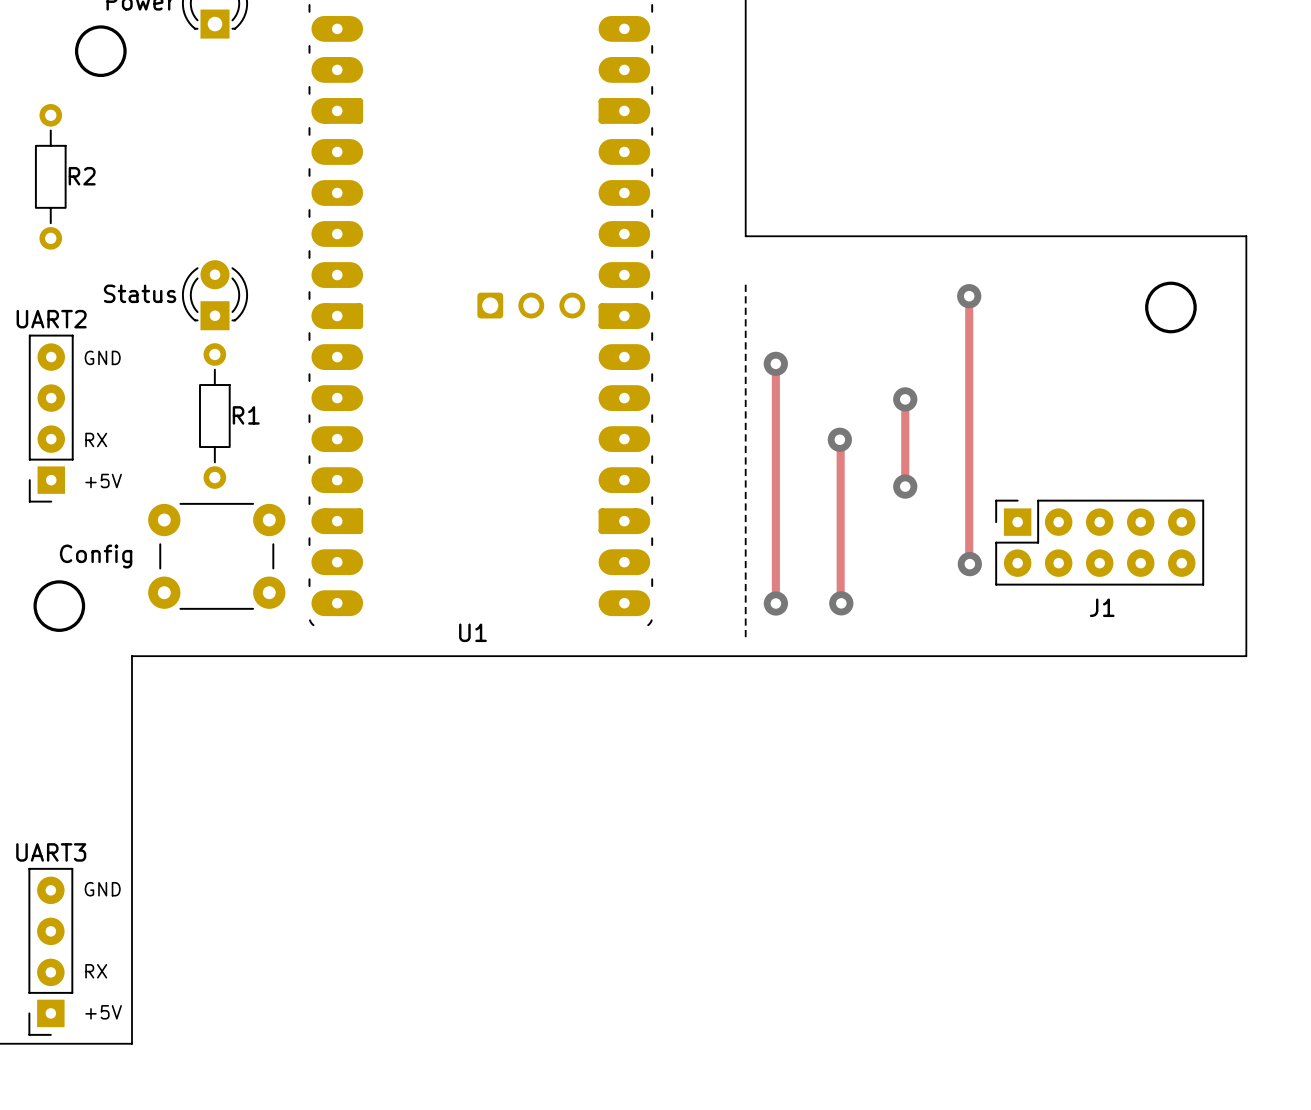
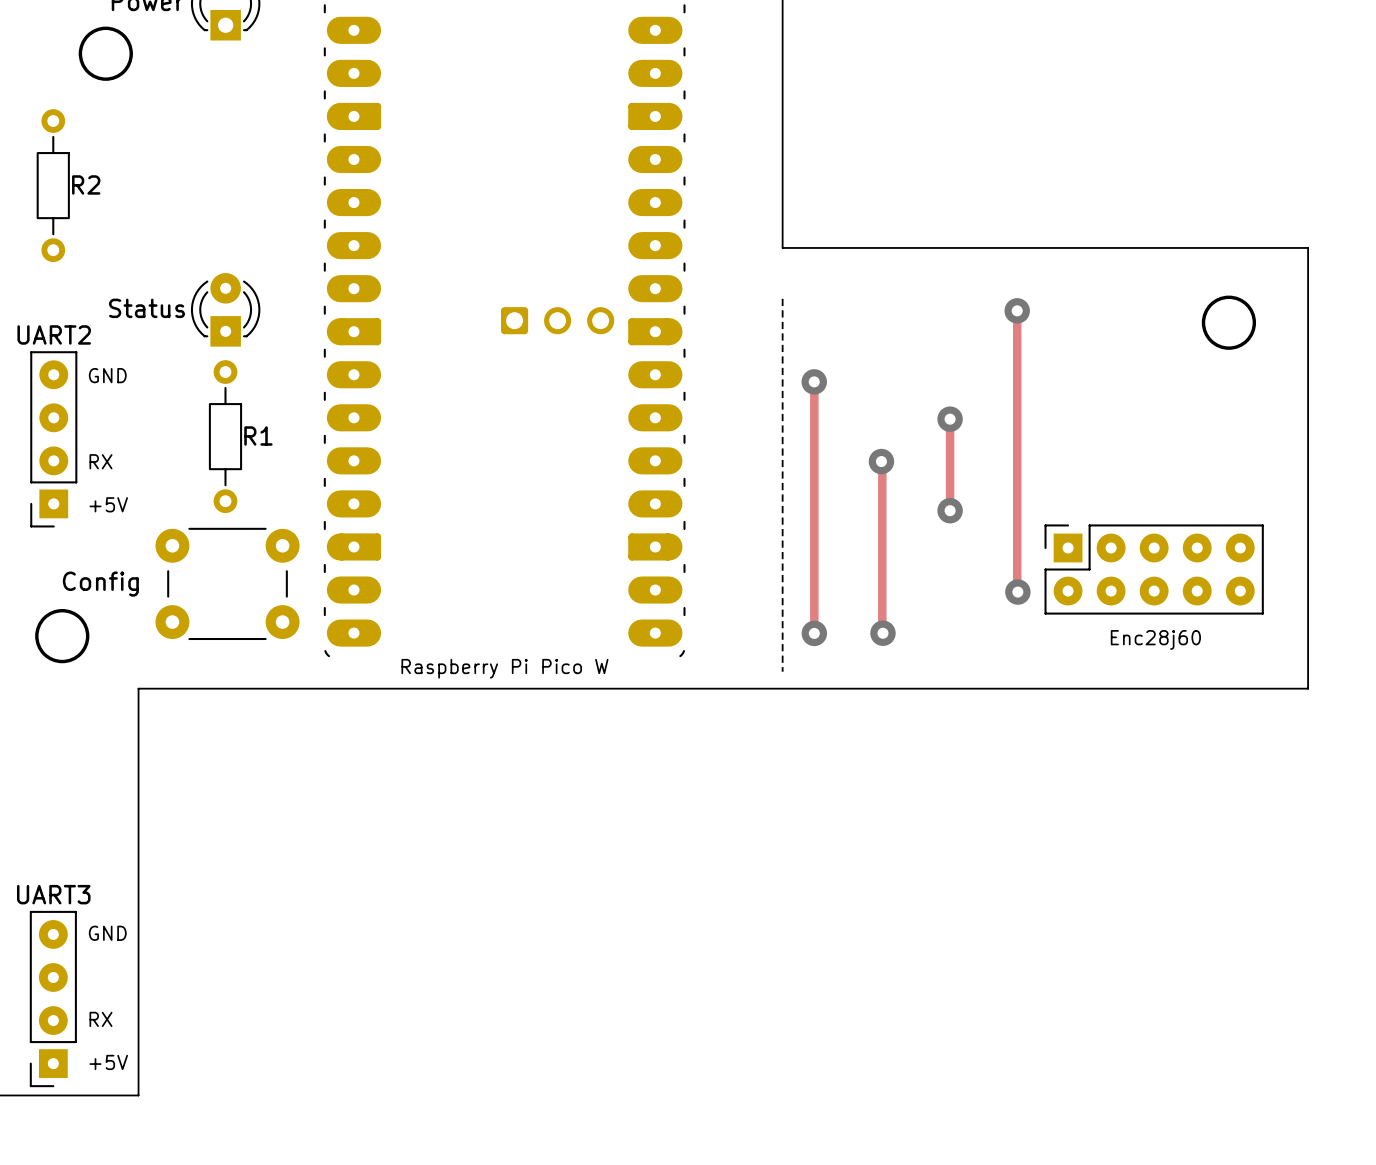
J1 name: J1 (1102, 607) -> none
text: none -> Enc28j60 (1155, 639)
U1 name: U1 (472, 632) -> none
text: none -> Raspberry Pi Pico W (504, 668)

